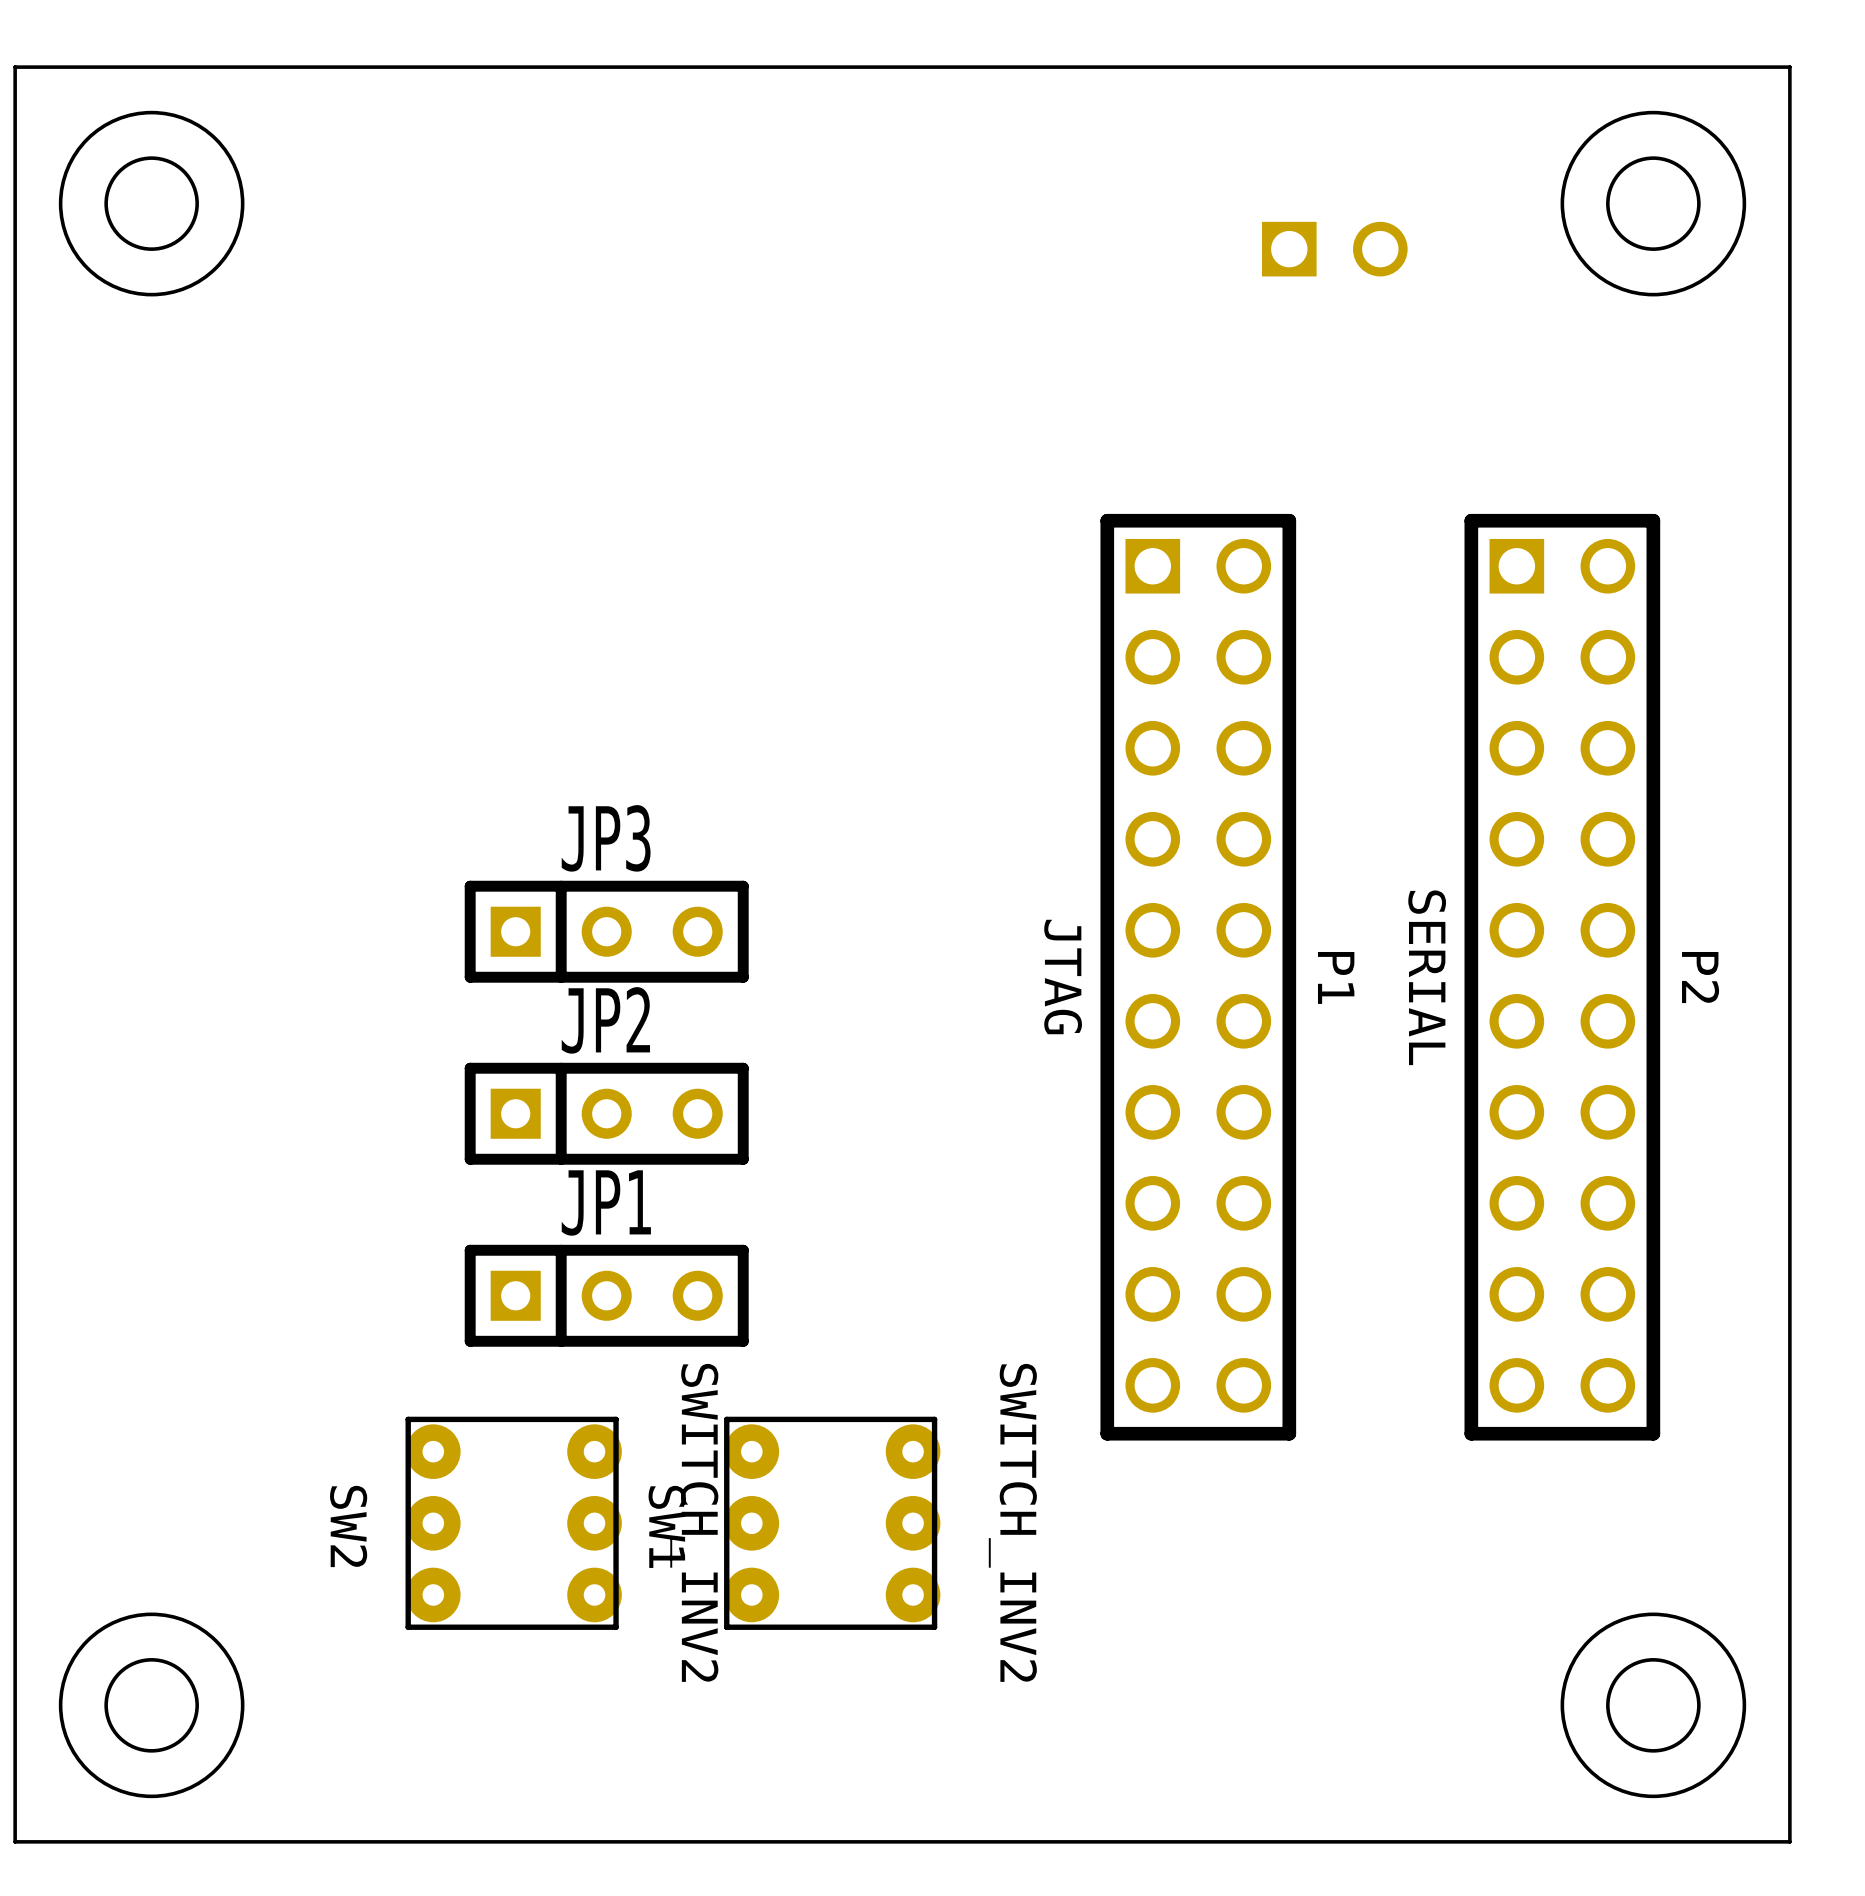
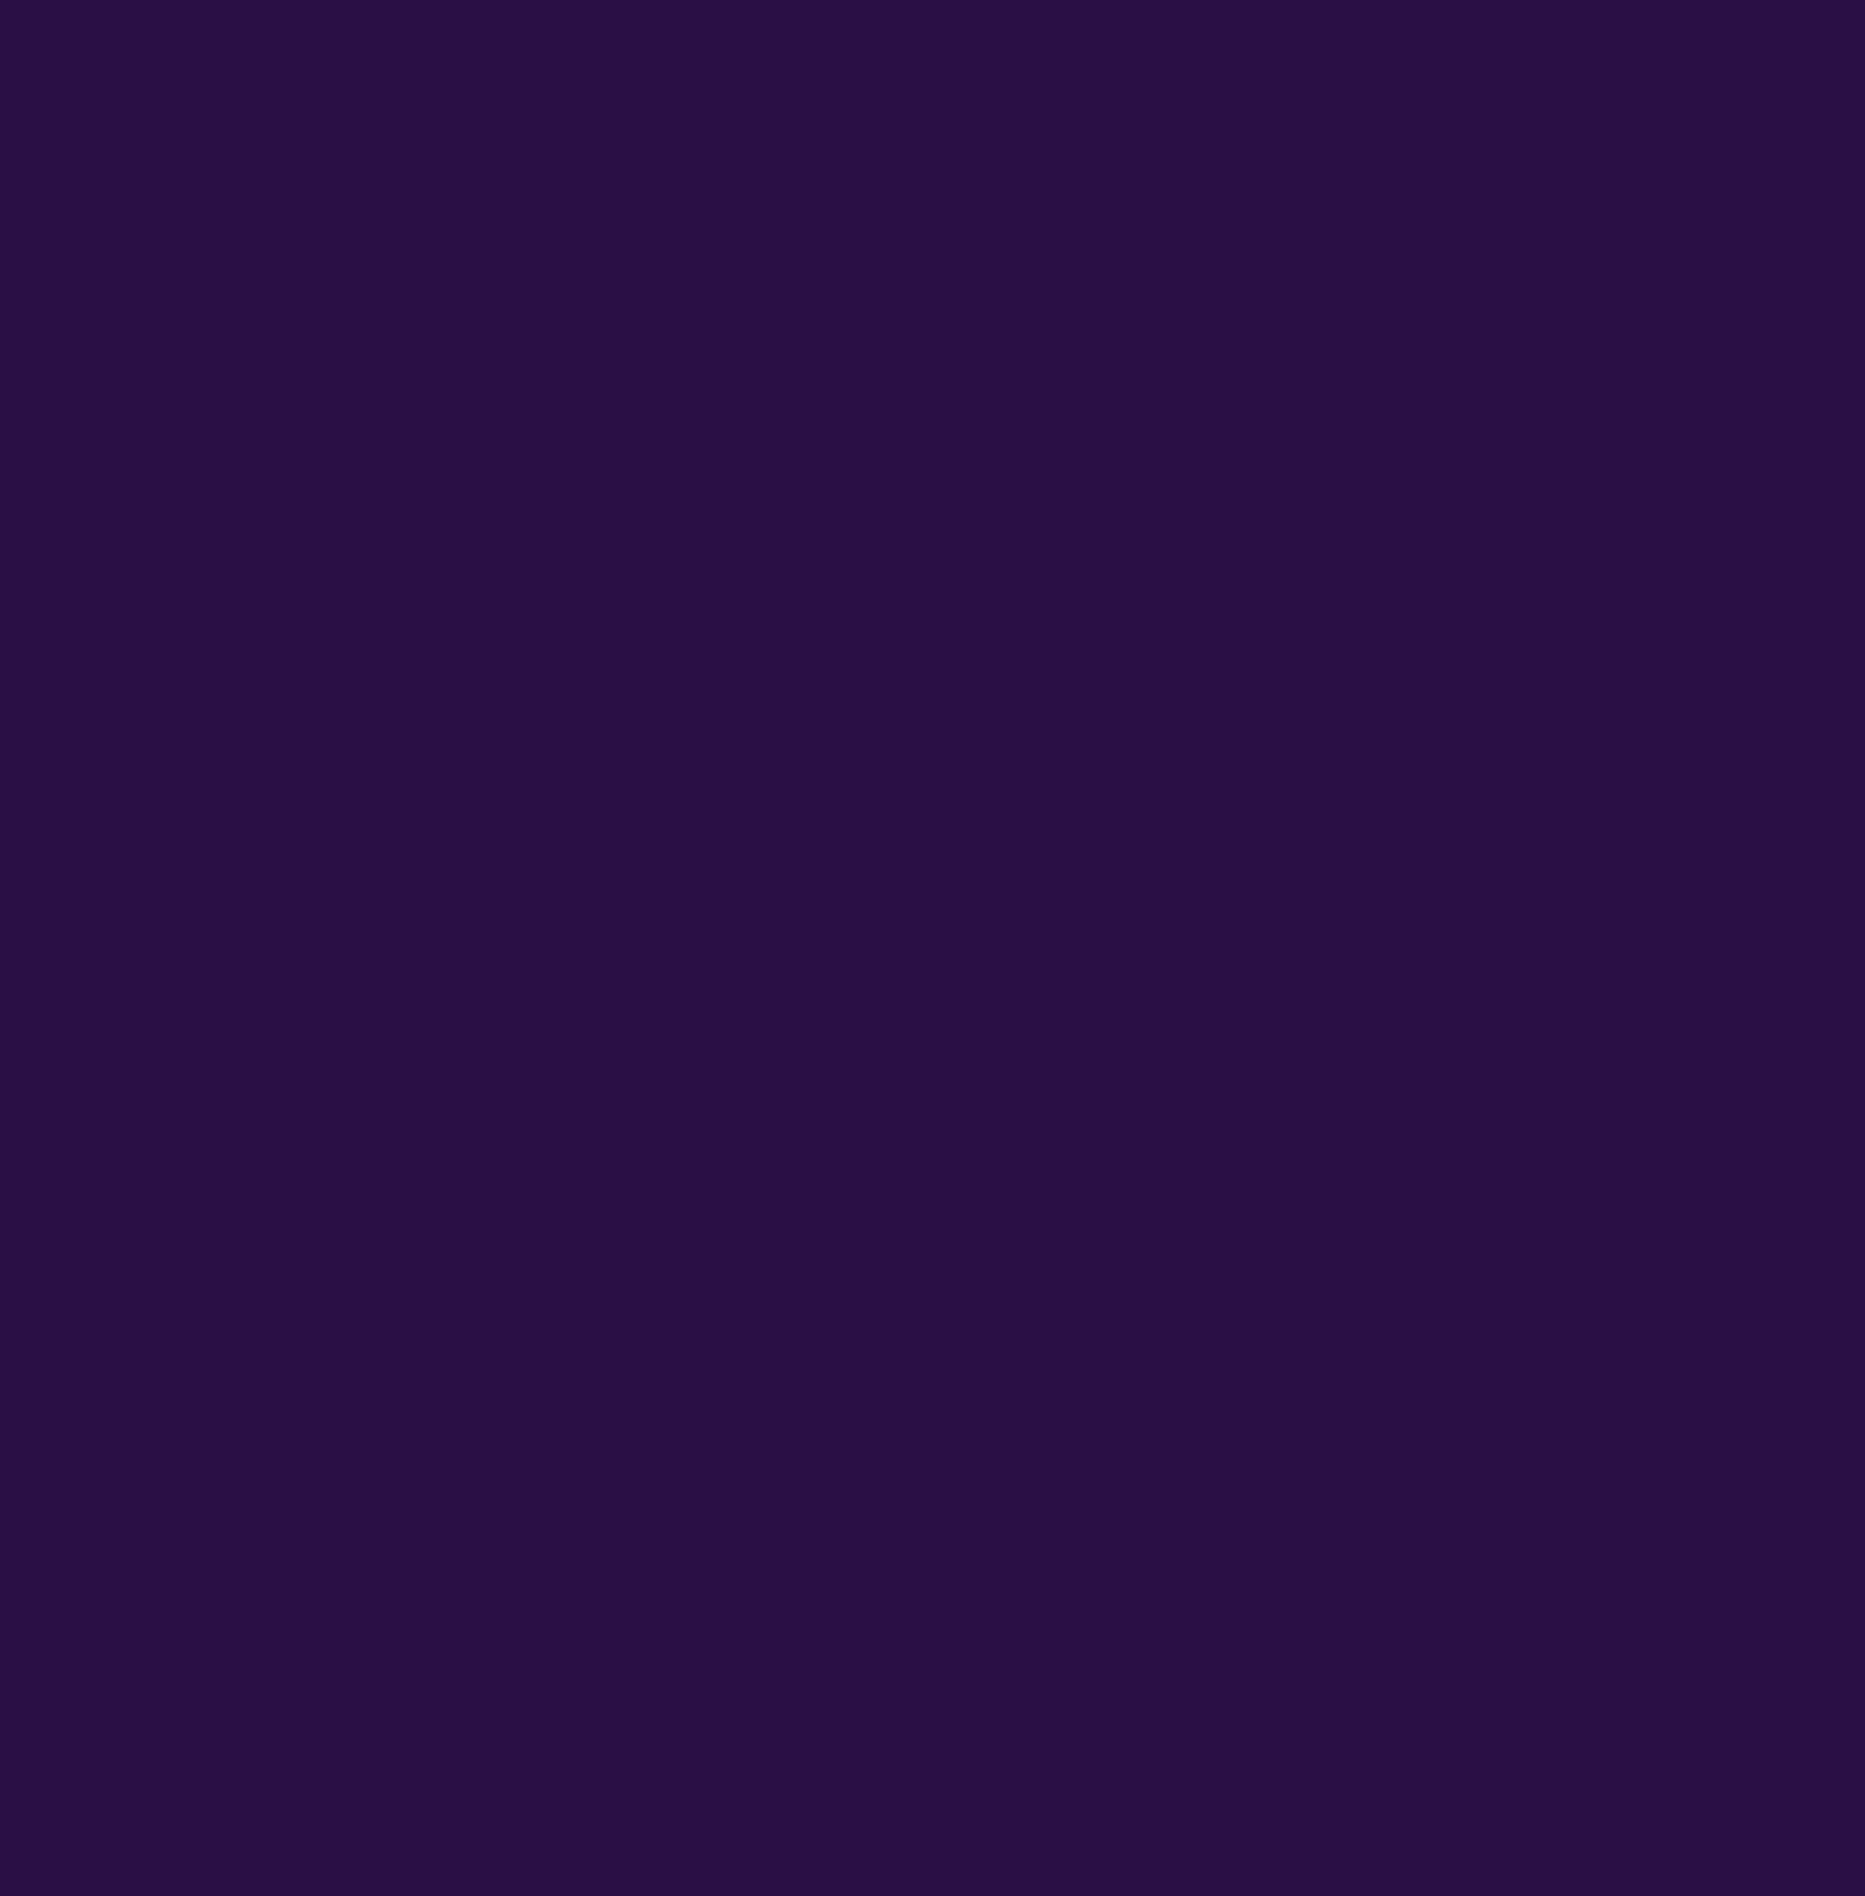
board edge: (1789, 67) (15, 67) (15, 1841) (1789, 1841) (1789, 67) -> none
round board edge: [58, 110, 245, 297] -> none
round board edge: [1560, 110, 1747, 297] -> none
round board edge: [104, 156, 199, 251] -> none
round board edge: [1606, 156, 1701, 251] -> none
part: (1334, 249) -> none
JP3: (606, 931) -> none
P1: JTAG (1198, 977) -> none
P2: SERIAL (1562, 977) -> none
JP2: (606, 1113) -> none
JP1: (606, 1295) -> none
SW2: SWITCH_INV2 (513, 1523) -> none
SW1: SWITCH_INV2 (832, 1523) -> none
round board edge: [58, 1612, 245, 1799] -> none
round board edge: [1560, 1612, 1747, 1799] -> none
round board edge: [104, 1658, 199, 1753] -> none
round board edge: [1606, 1658, 1701, 1753] -> none

